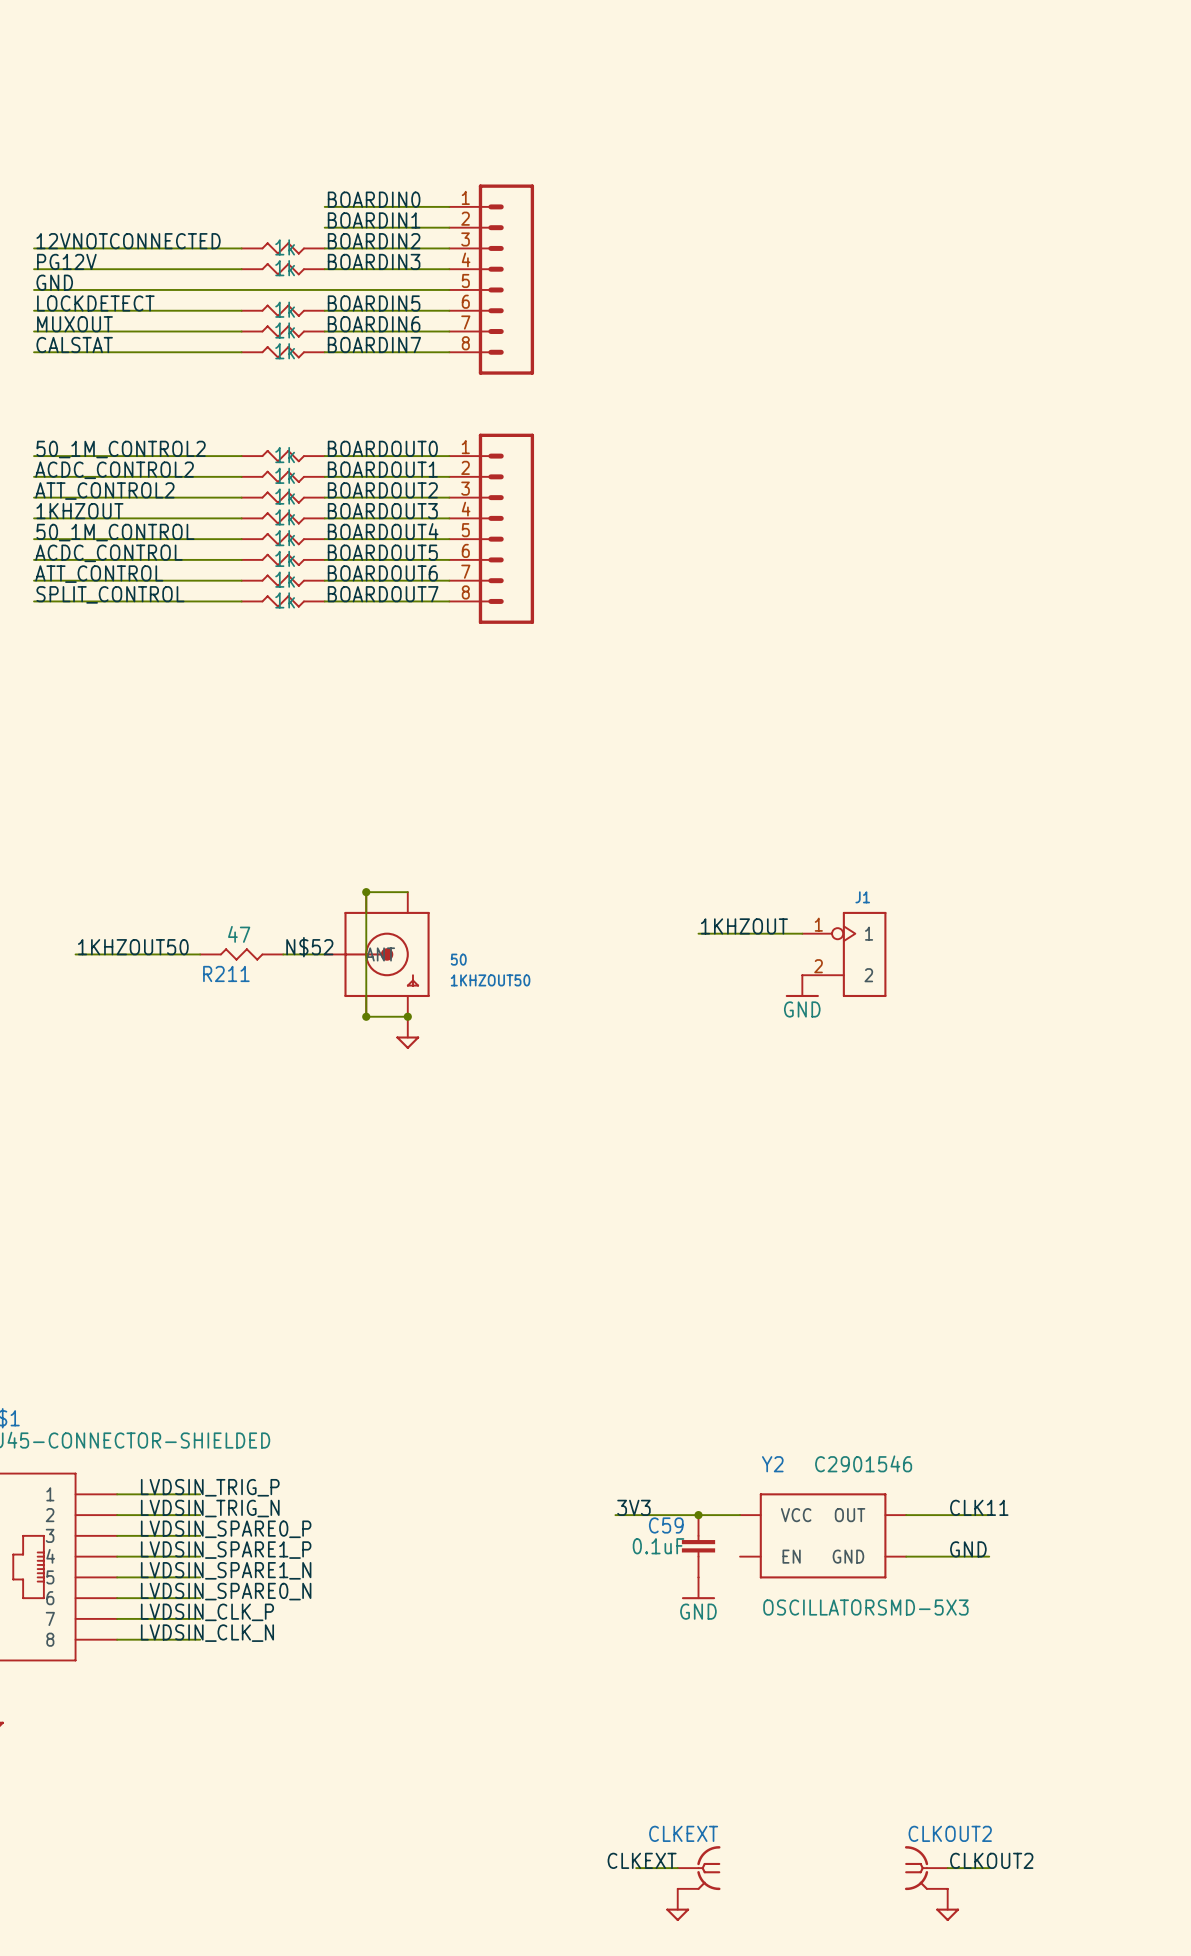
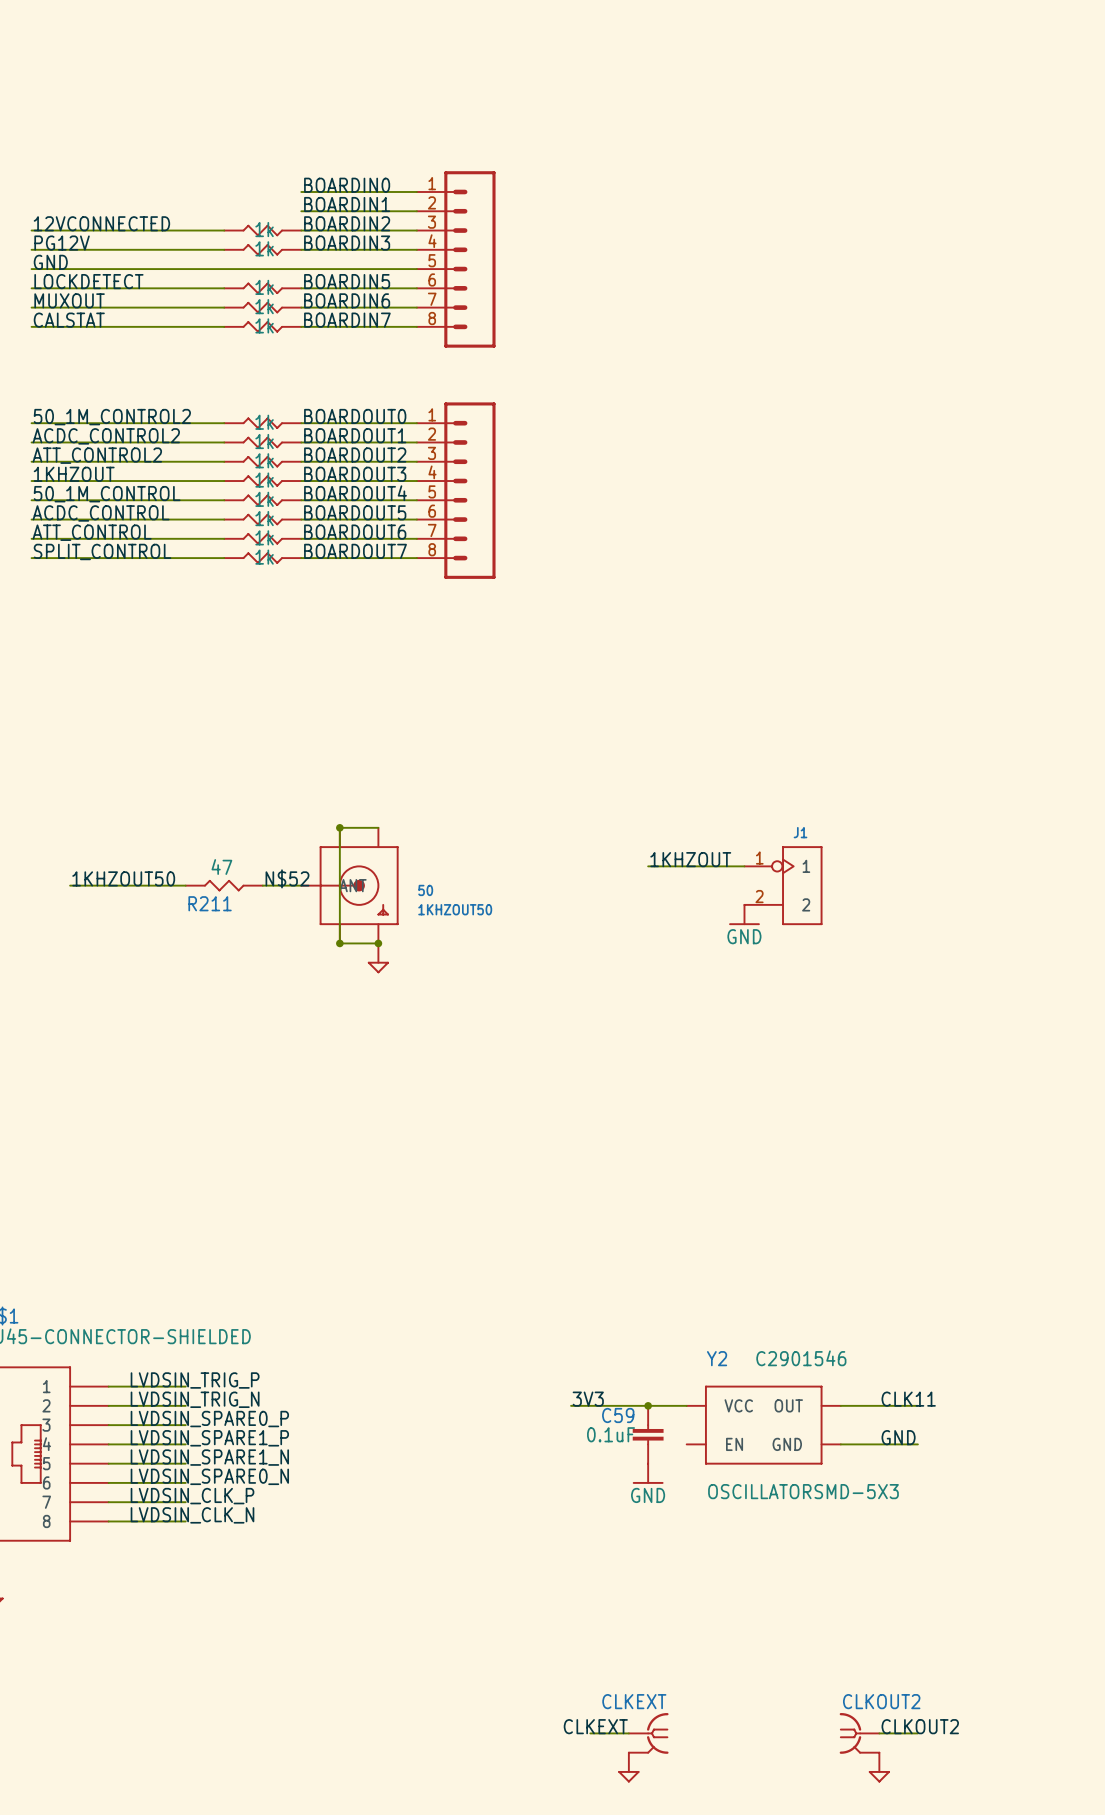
label: 12VNOTCONNECTED (128, 241) -> 12VCONNECTED (101, 223)

